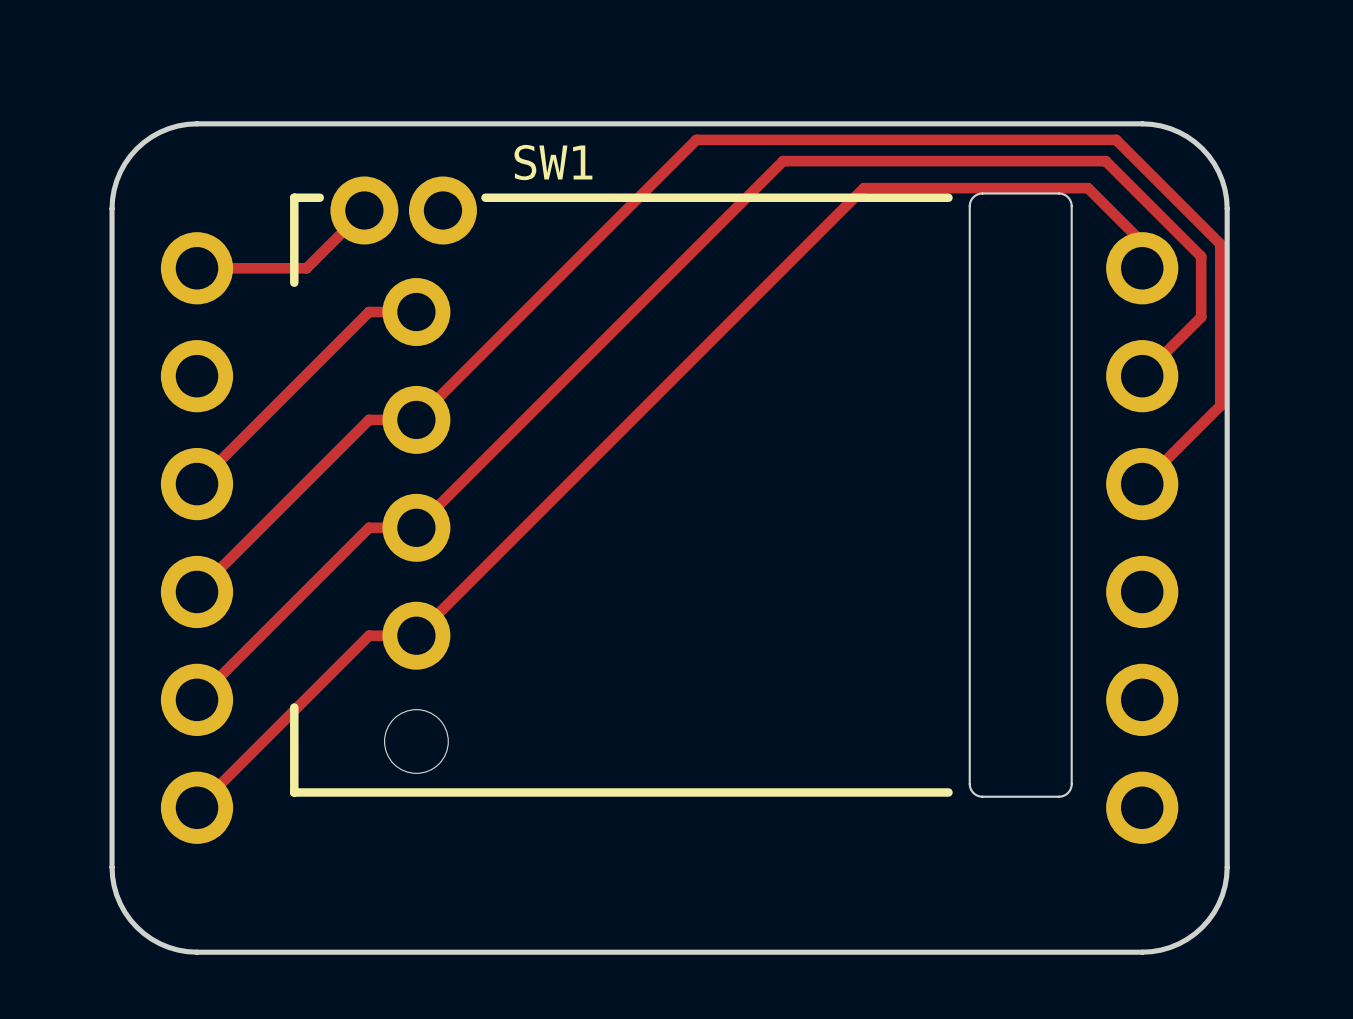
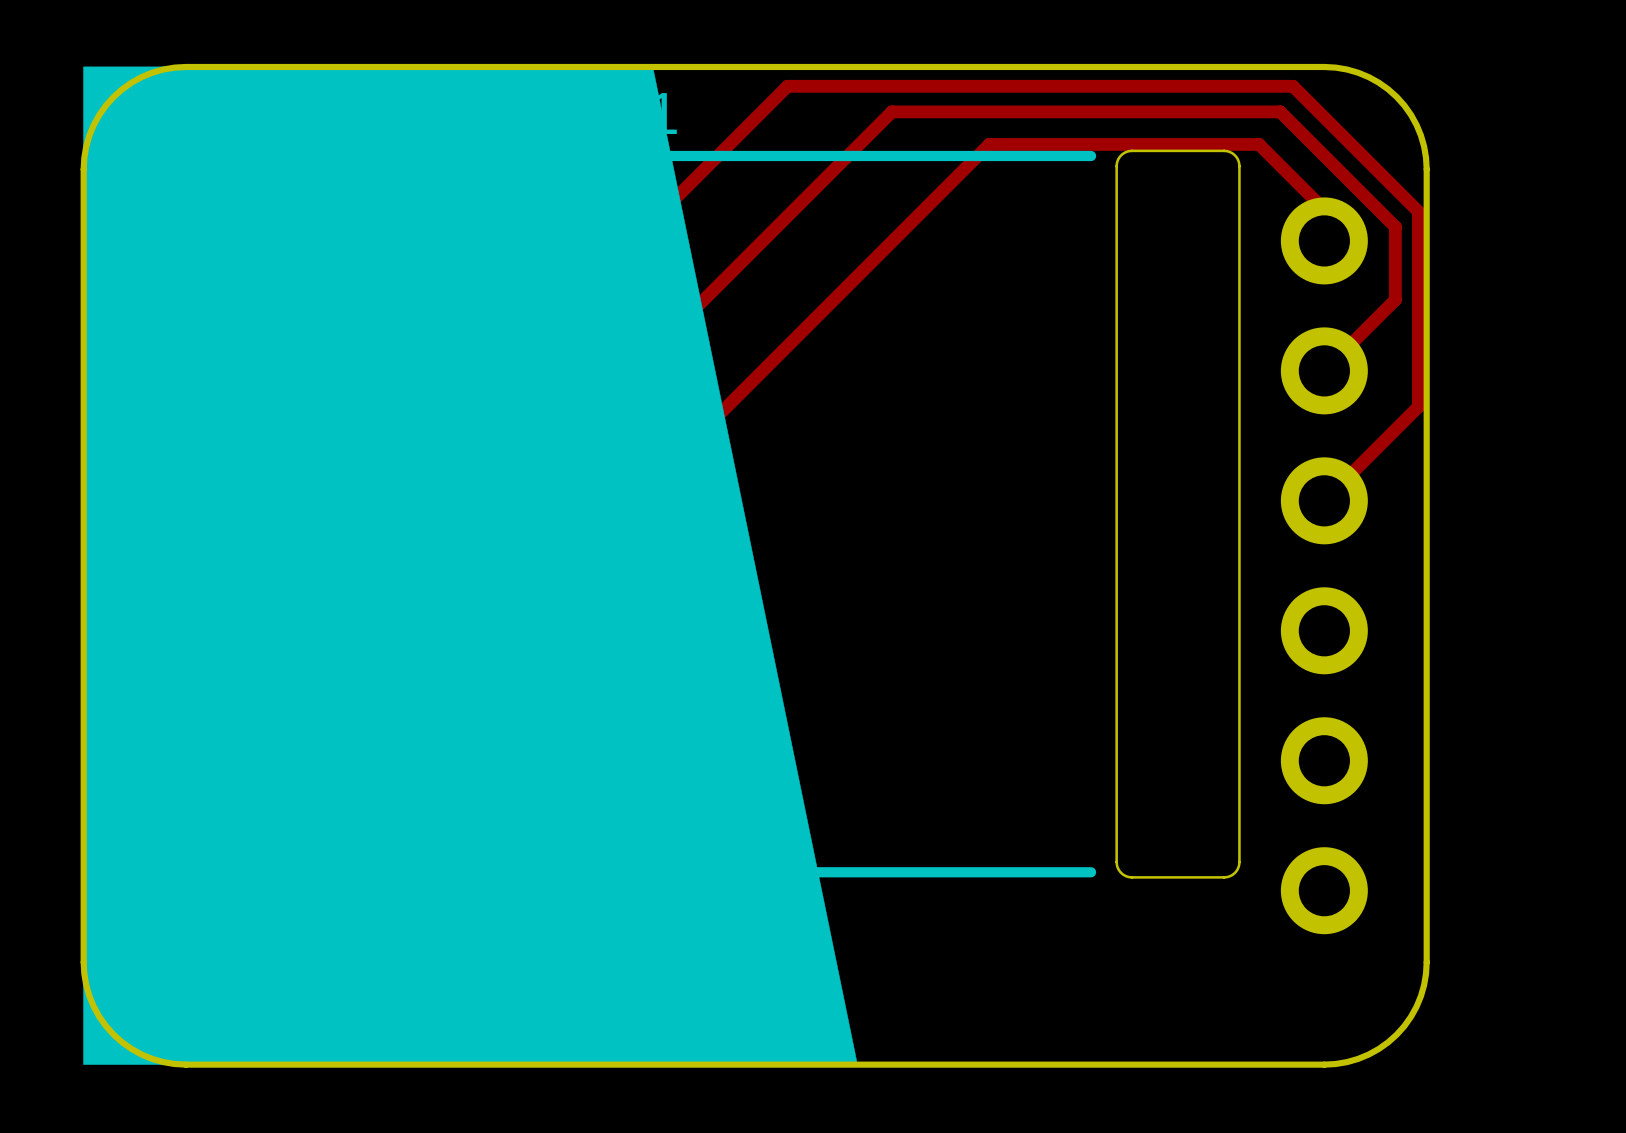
drawing: none -> [83, 66, 858, 1065]

